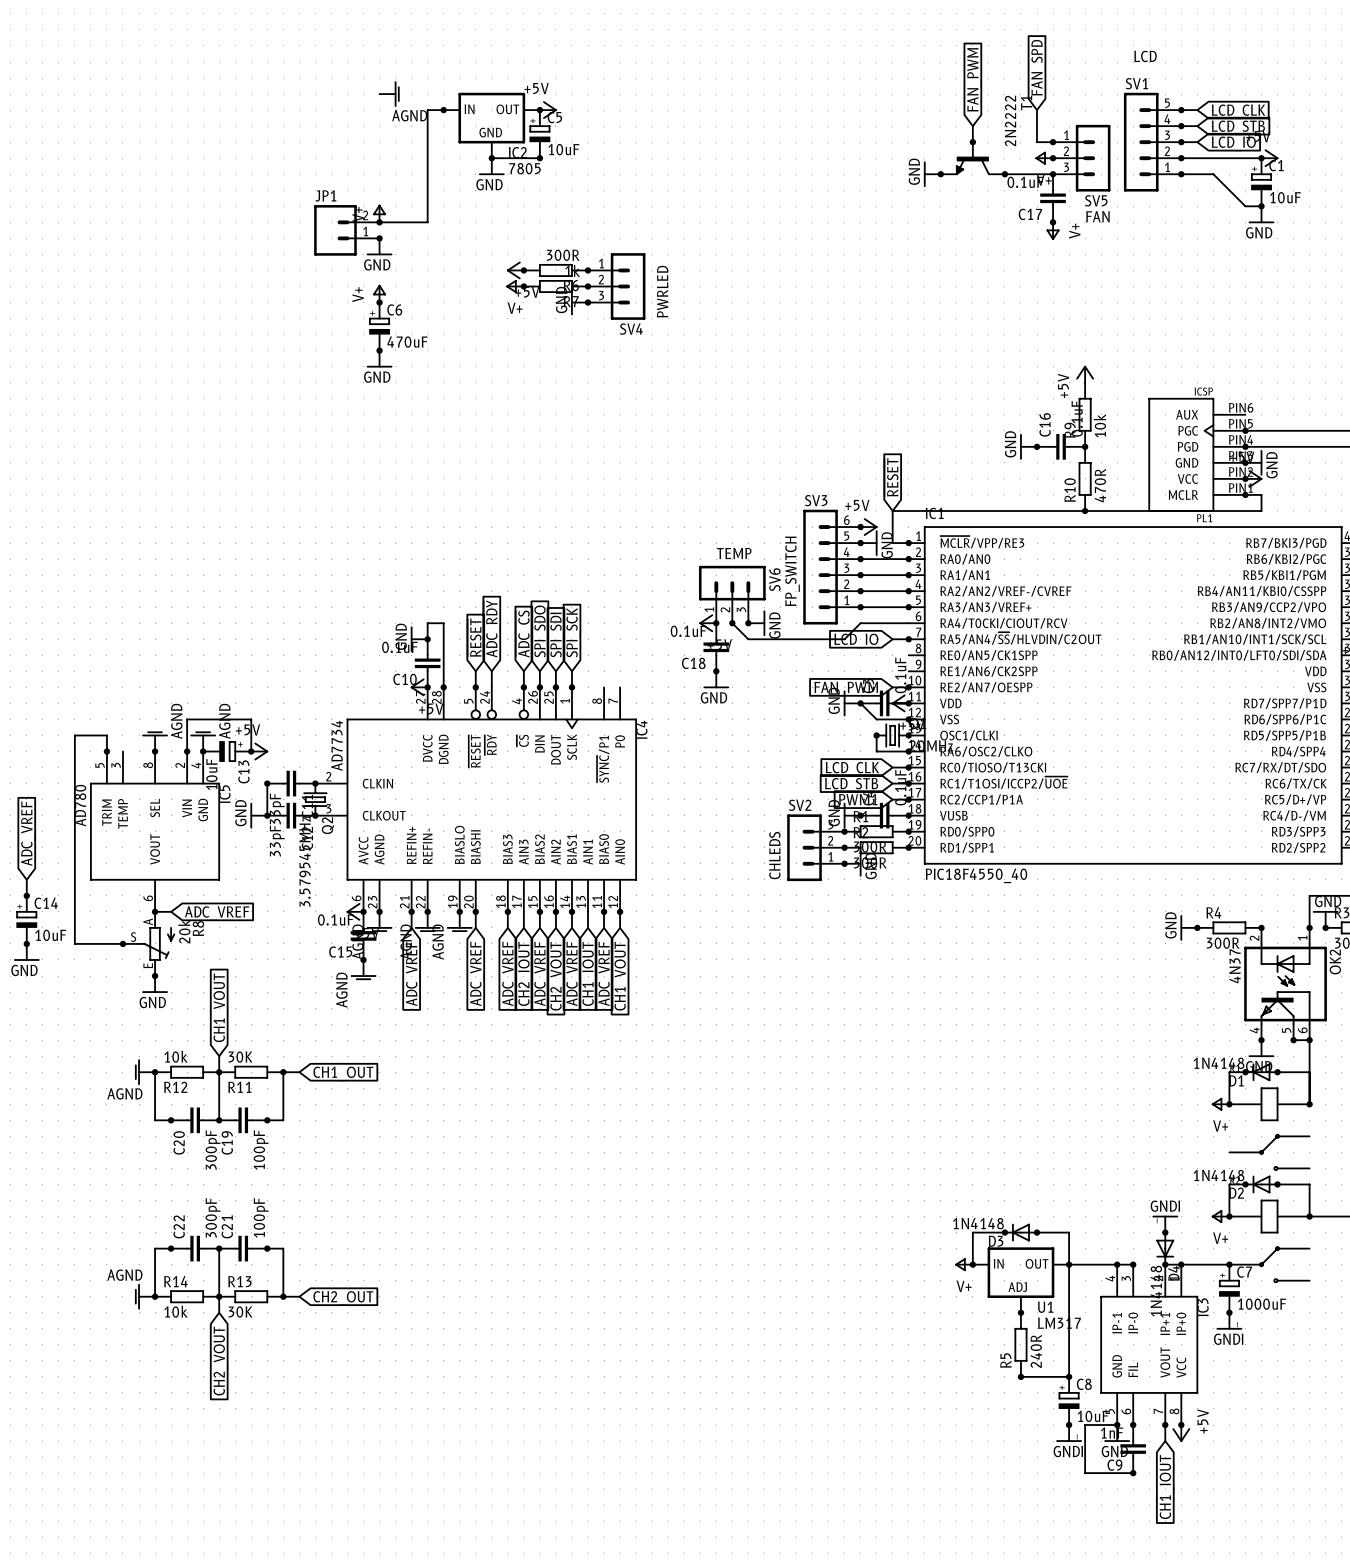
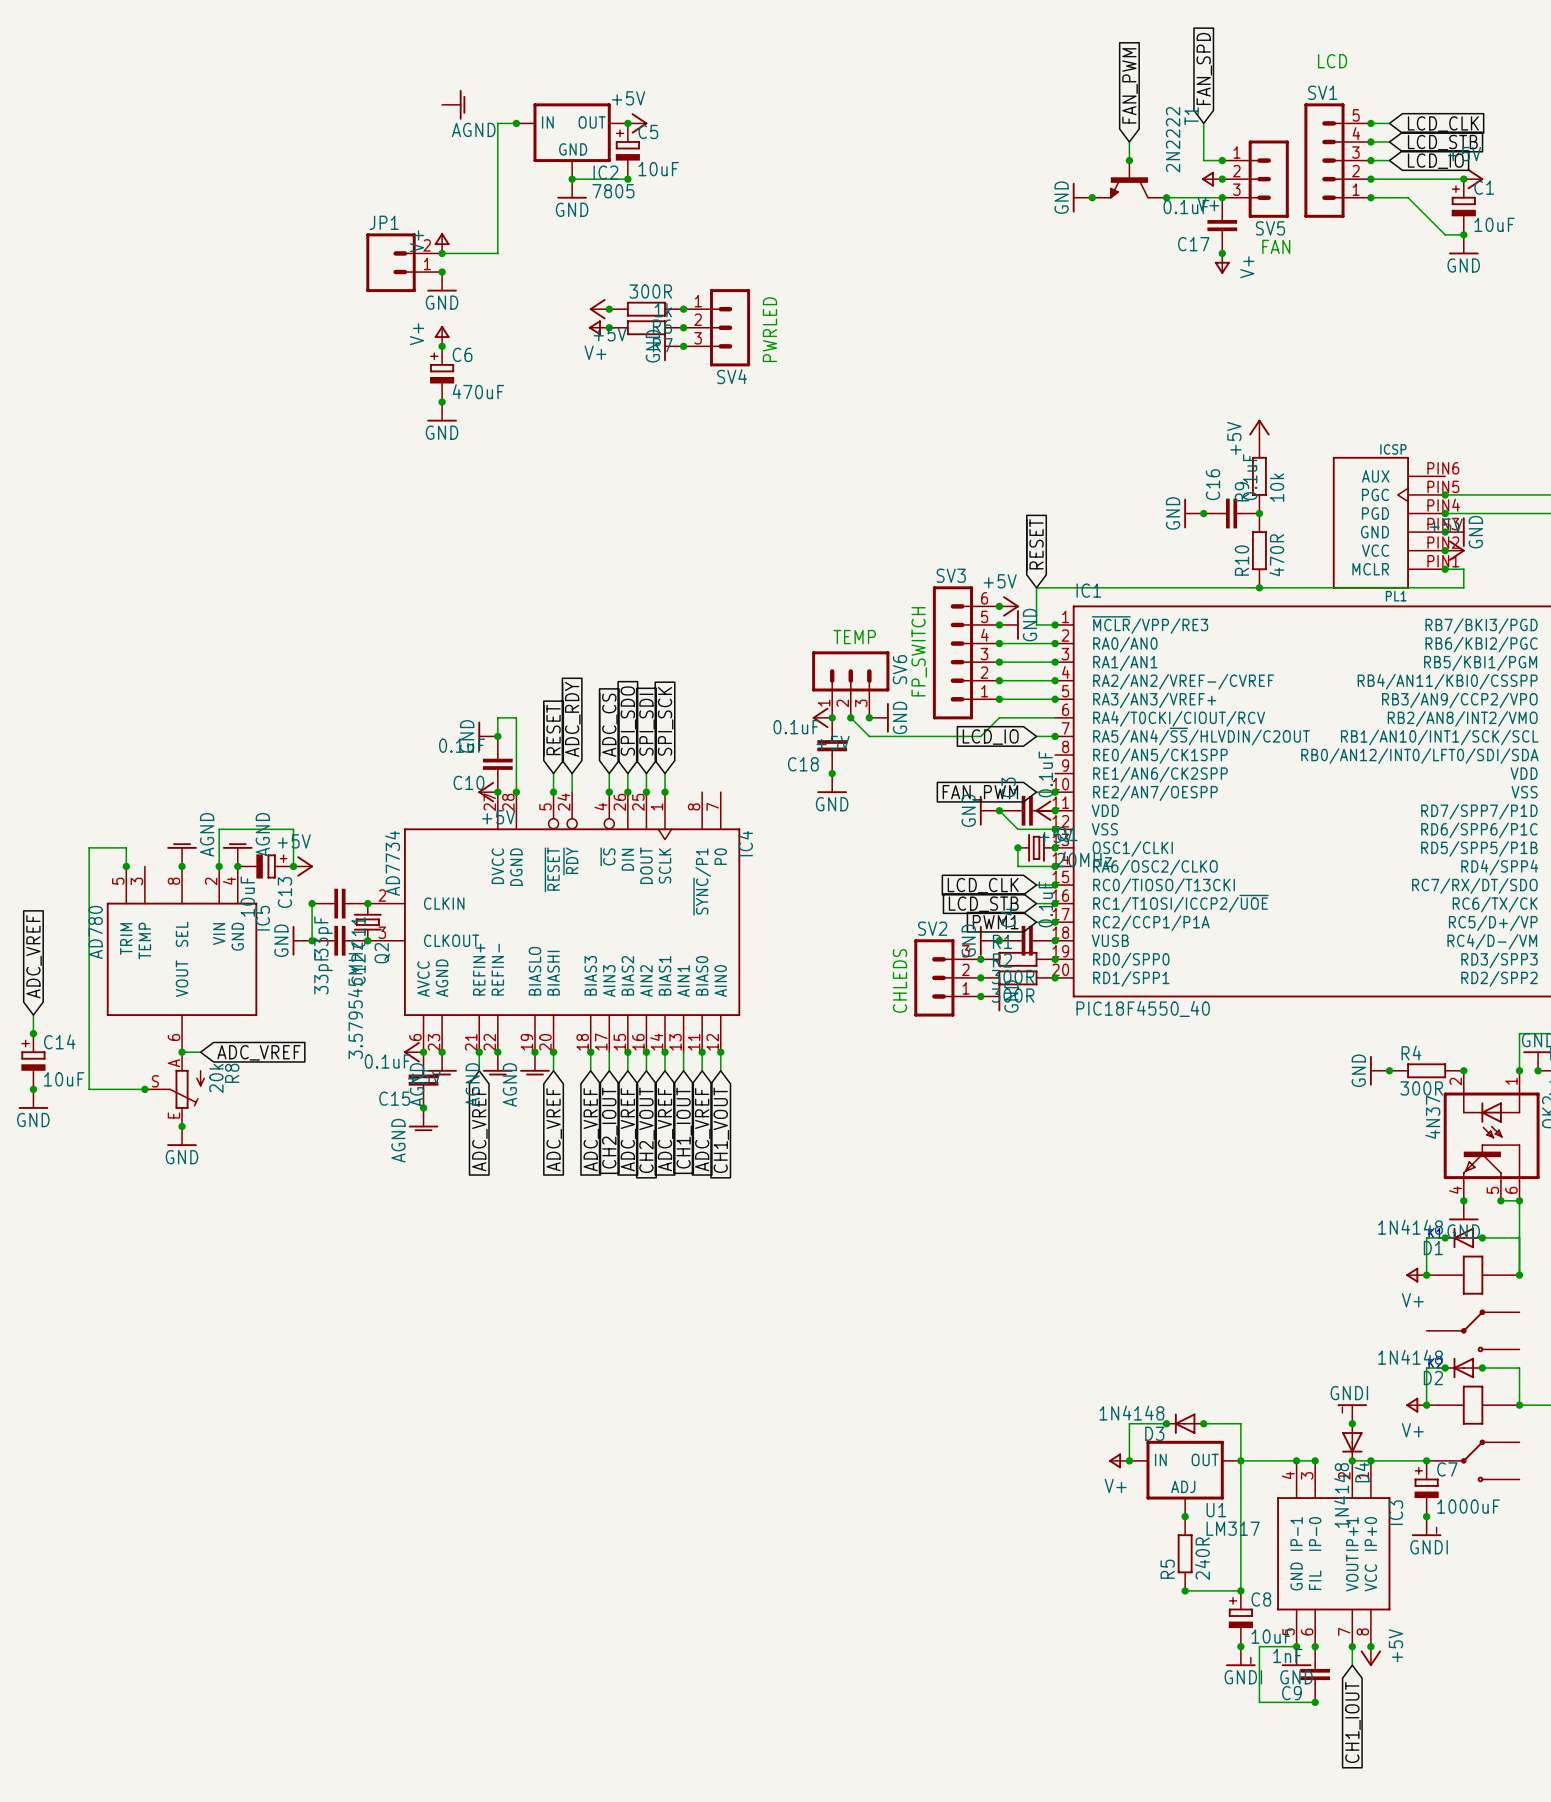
global label: CH1_VOUT (220, 1007) -> none
wire: (219, 1056) (219, 1120) -> none
power symbol: AGND (145, 1072) -> none
wire: (155, 1072) (155, 1120) (171, 1120) -> none
junction: (155, 1072) -> none
R12: 10k (187, 1072) -> none
junction: (219, 1072) -> none
R11: 30K (251, 1072) -> none
junction: (283, 1072) -> none
wire: (299, 1072) (283, 1072) (283, 1120) (267, 1120) -> none
global label: CH1_OUT (343, 1073) -> none
junction: (171, 1120) -> none
C20: 300pF (195, 1120) -> none
junction: (219, 1120) -> none
C19: 100pF (243, 1120) -> none
junction: (267, 1120) -> none
wire: (171, 1248) (155, 1248) (155, 1296) -> none
junction: (171, 1248) -> none
C22: 300pF (195, 1248) -> none
wire: (219, 1248) (219, 1312) -> none
junction: (219, 1248) -> none
C21: 100pF (243, 1248) -> none
wire: (267, 1248) (283, 1248) (283, 1296) (299, 1296) -> none
junction: (267, 1248) -> none
power symbol: AGND (145, 1296) -> none
junction: (155, 1296) -> none
R14: 10k (187, 1296) -> none
junction: (219, 1296) -> none
R13: 30K (251, 1296) -> none
junction: (283, 1296) -> none
global label: CH2_OUT (343, 1298) -> none
global label: CH2_VOUT (220, 1361) -> none

